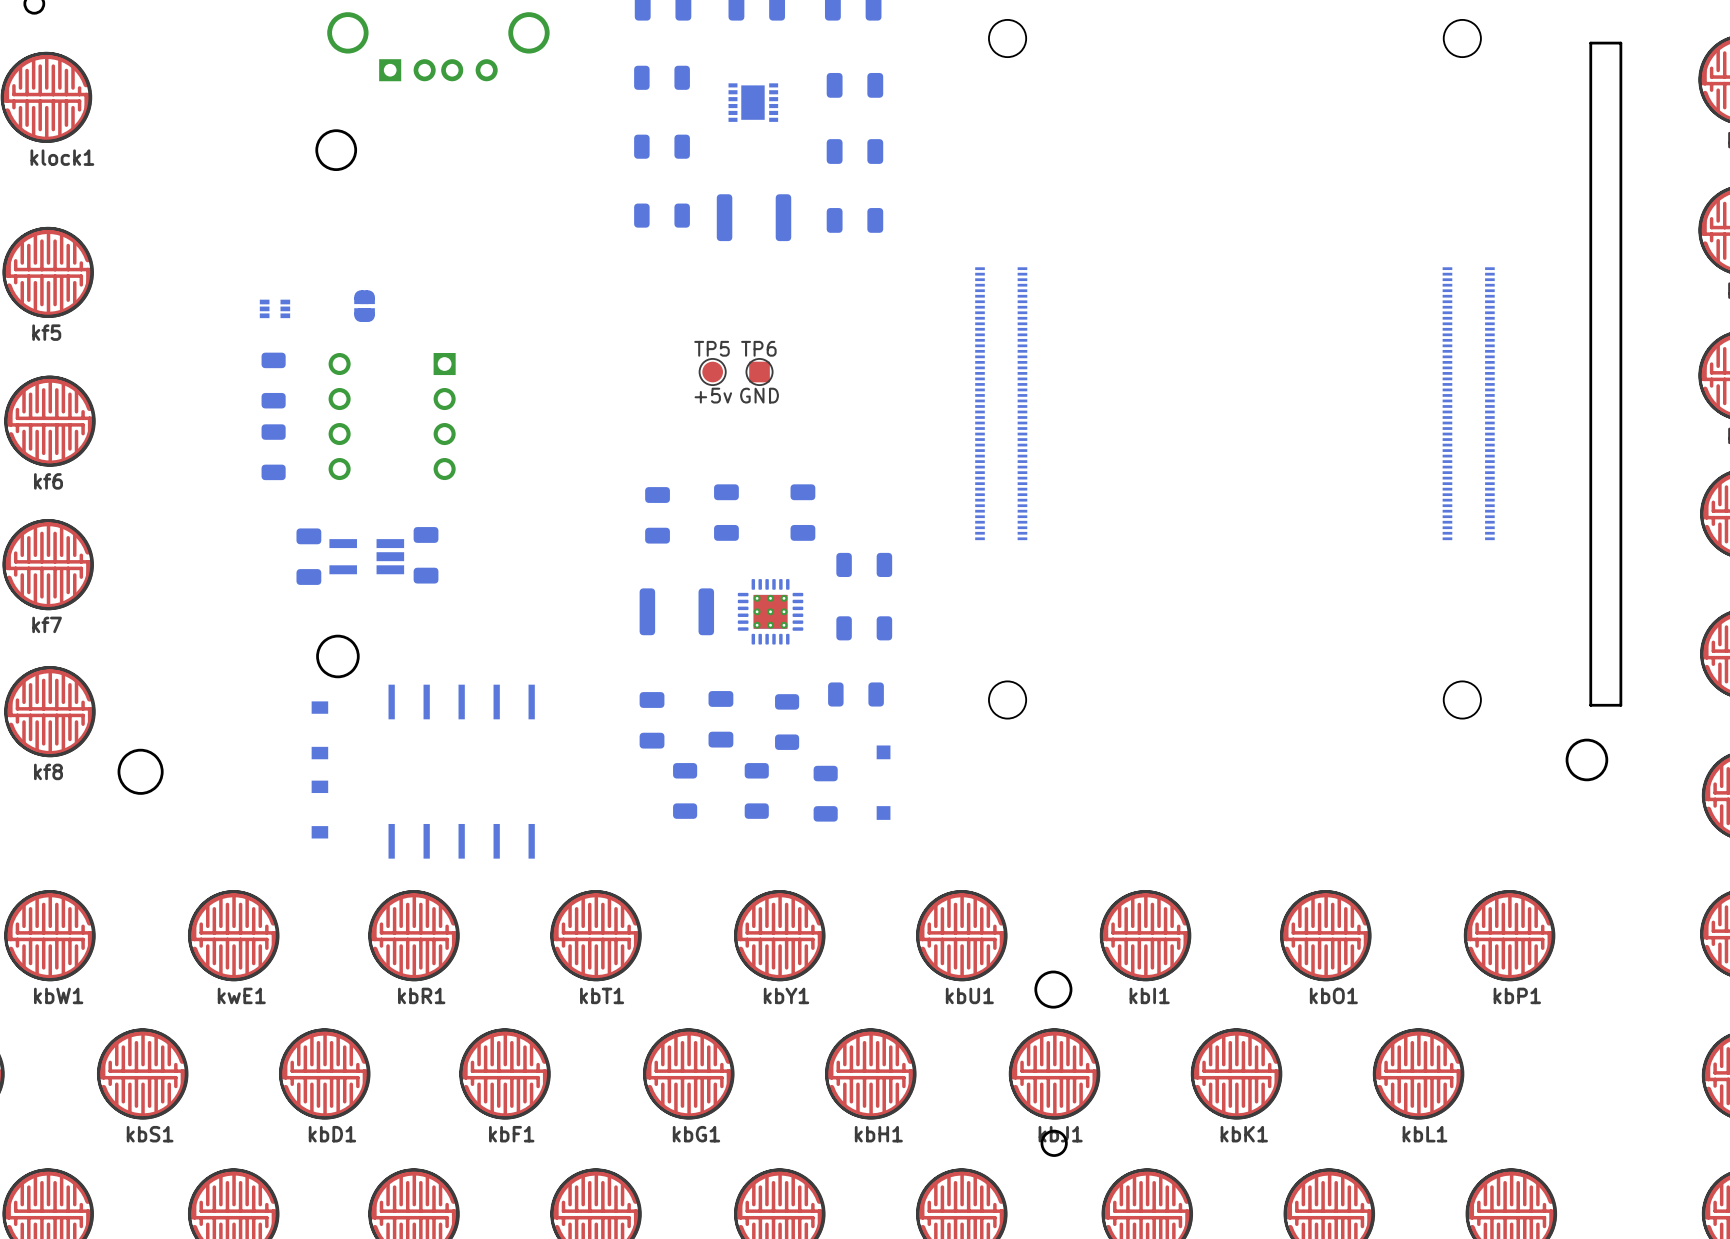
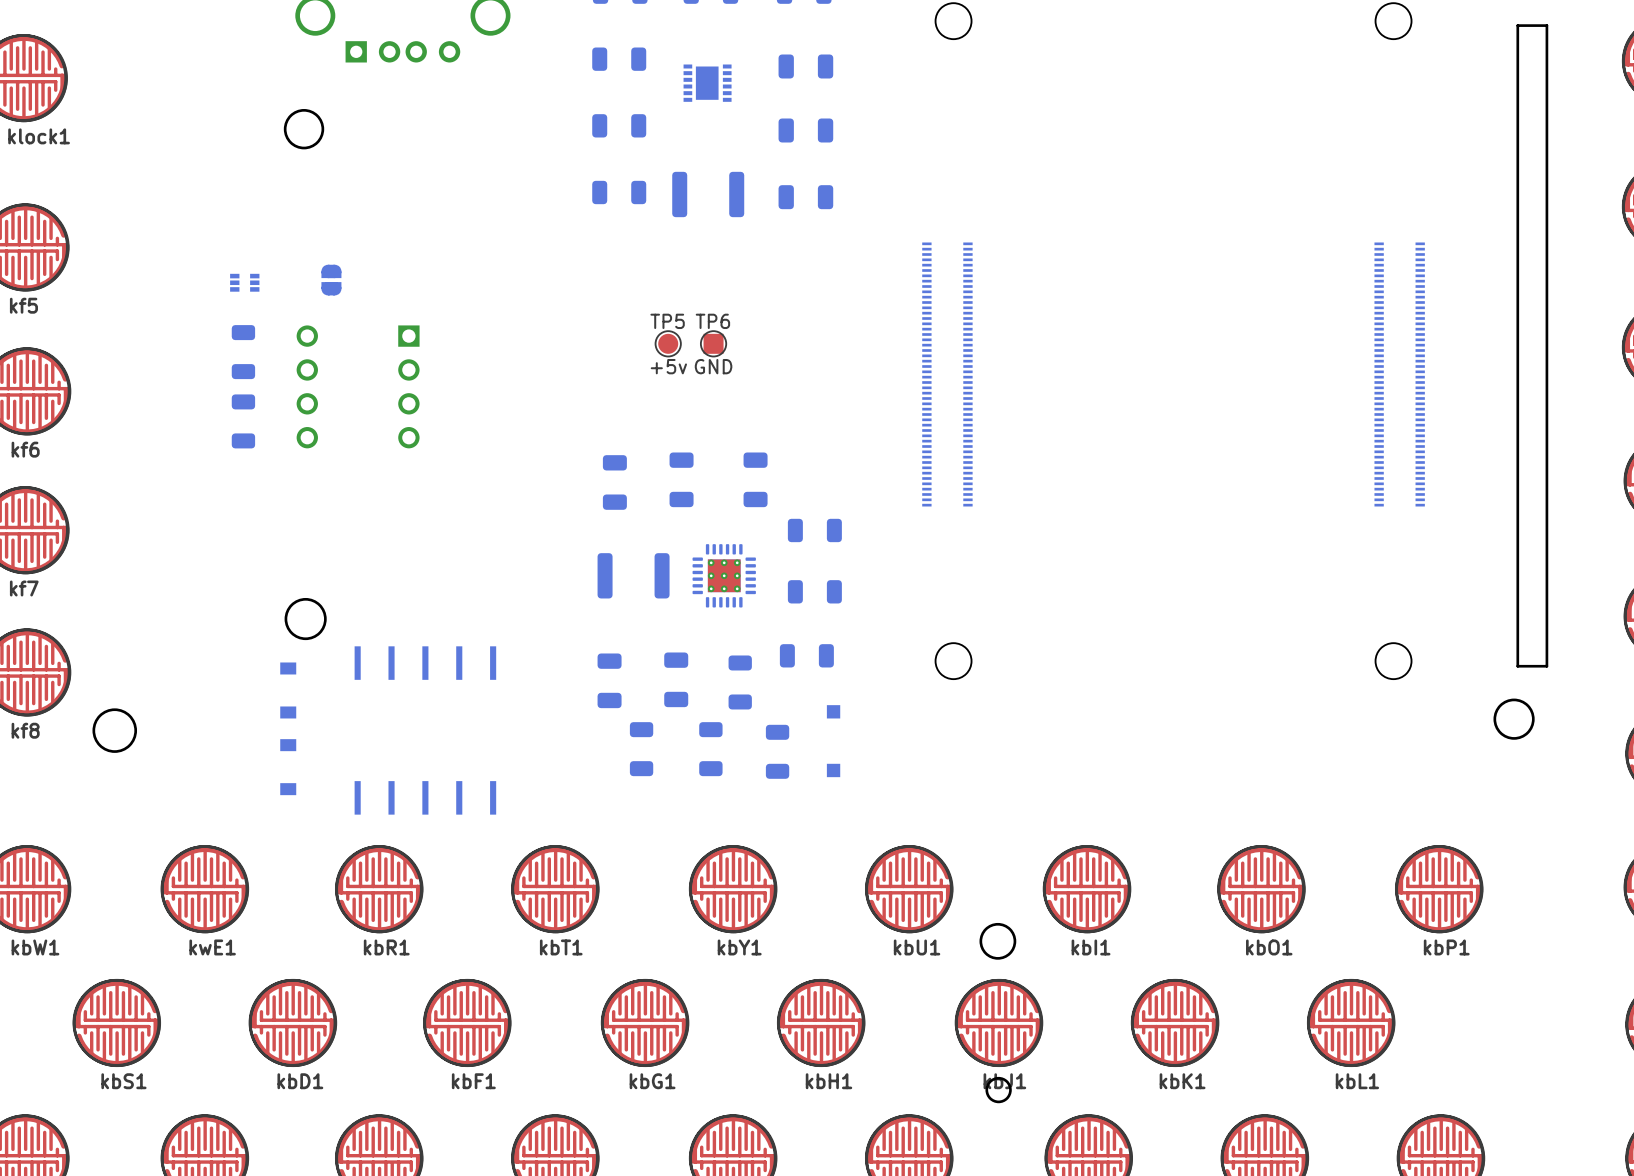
part: (426, 555) -> none
part: (308, 556) -> none
part: (366, 556) -> none

